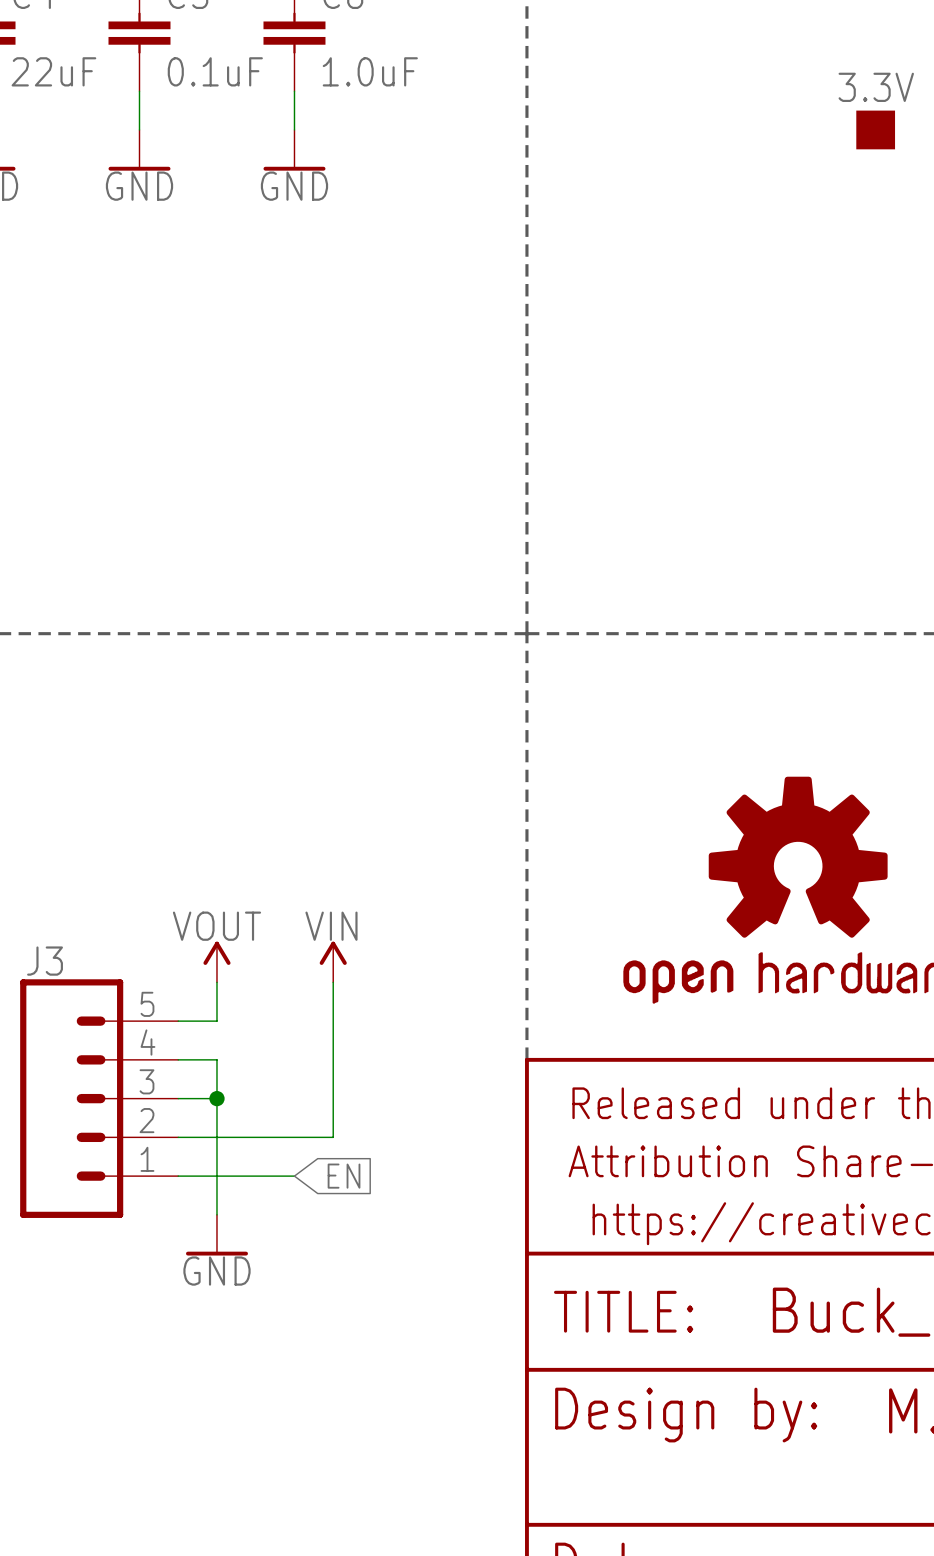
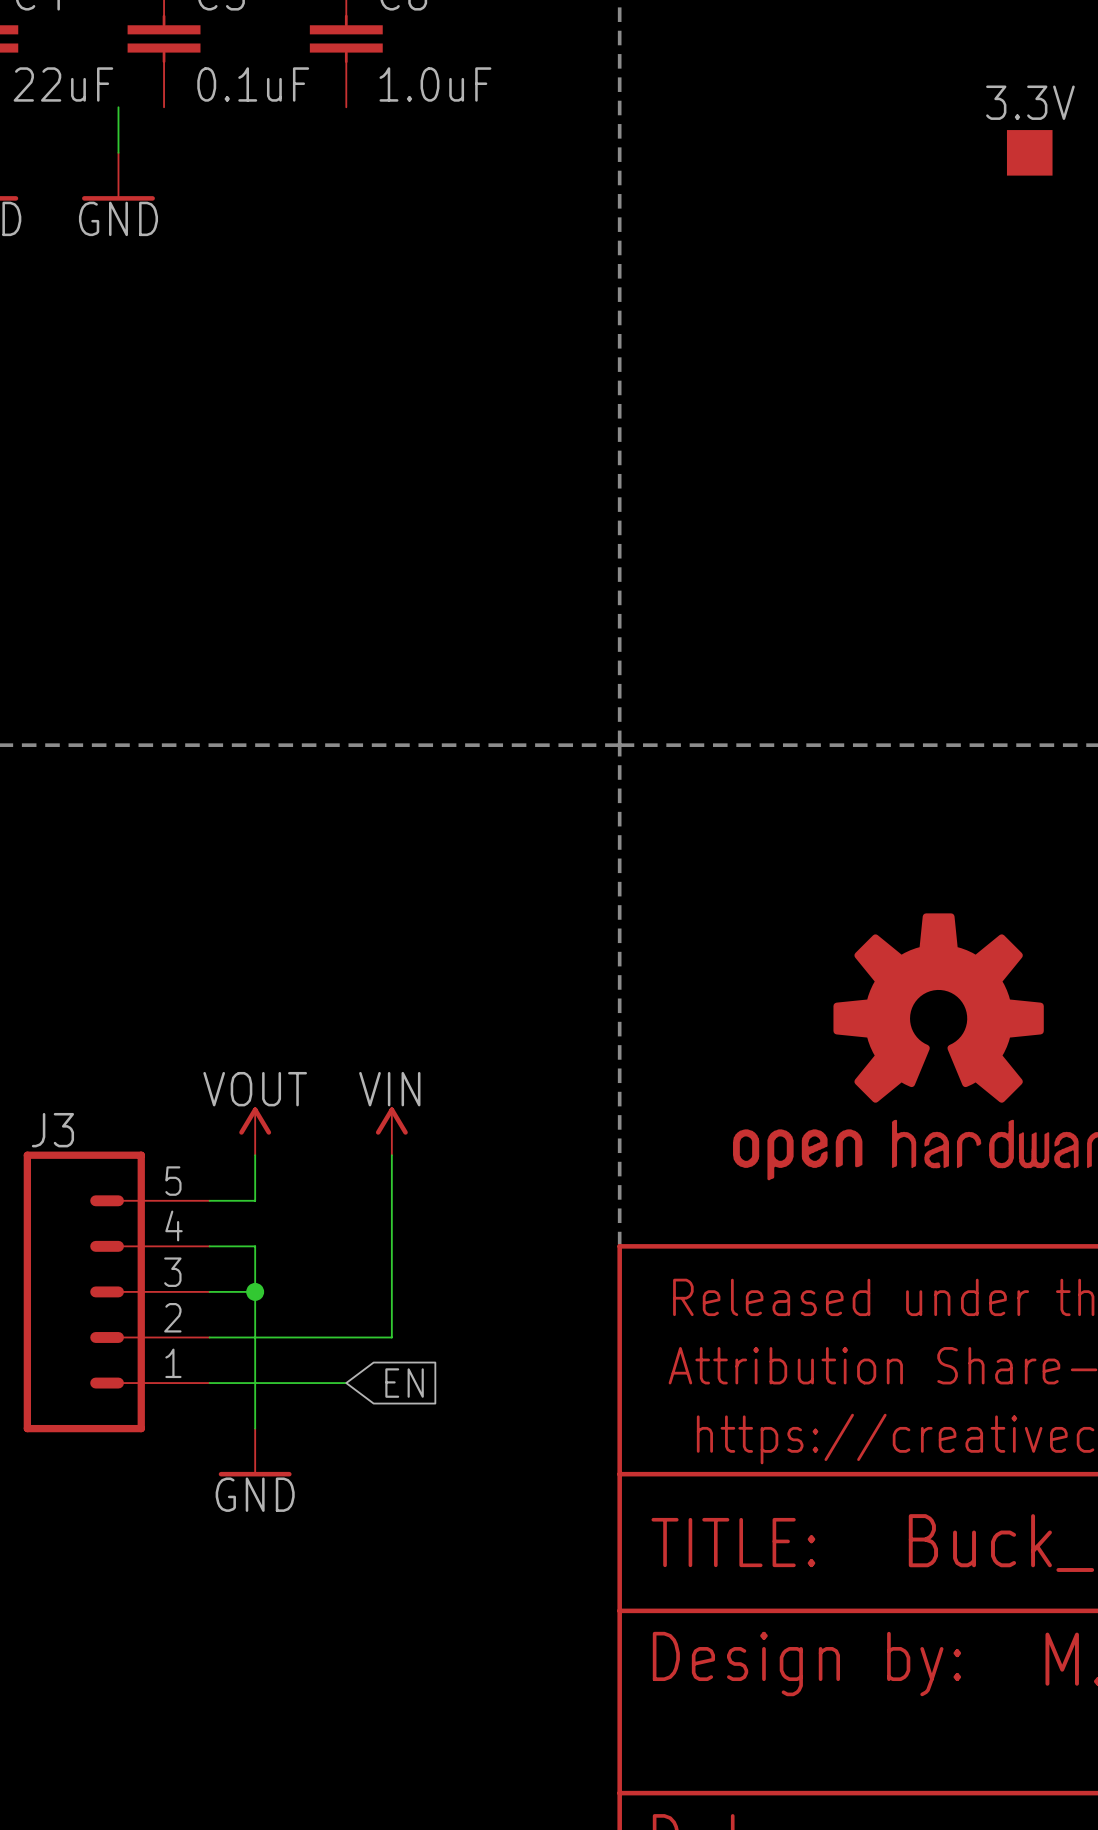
wire: (139, 91) (139, 129) -> (118, 107) (118, 152)
wire: (294, 91) (294, 129) -> none
power symbol position: GND (139, 150) -> GND (118, 176)
power symbol: GND (294, 150) -> none

